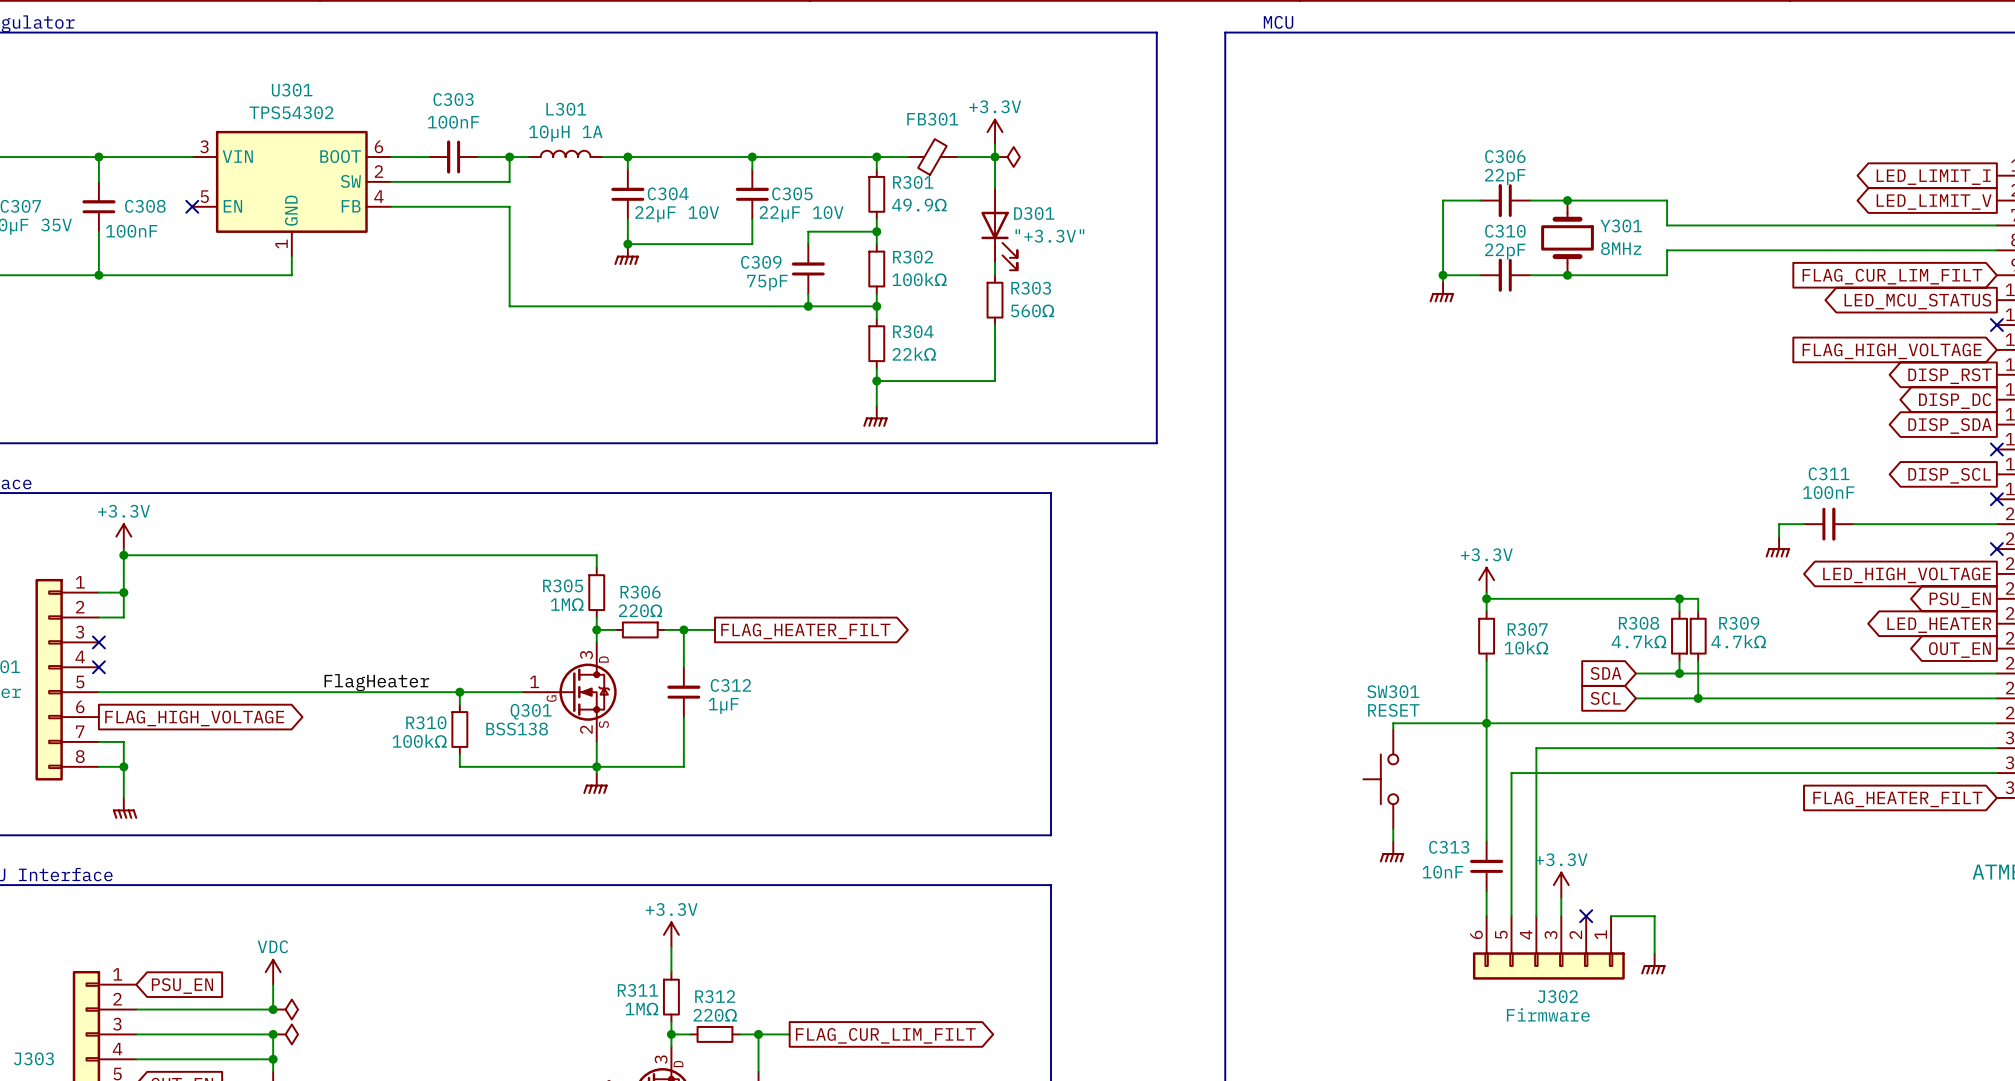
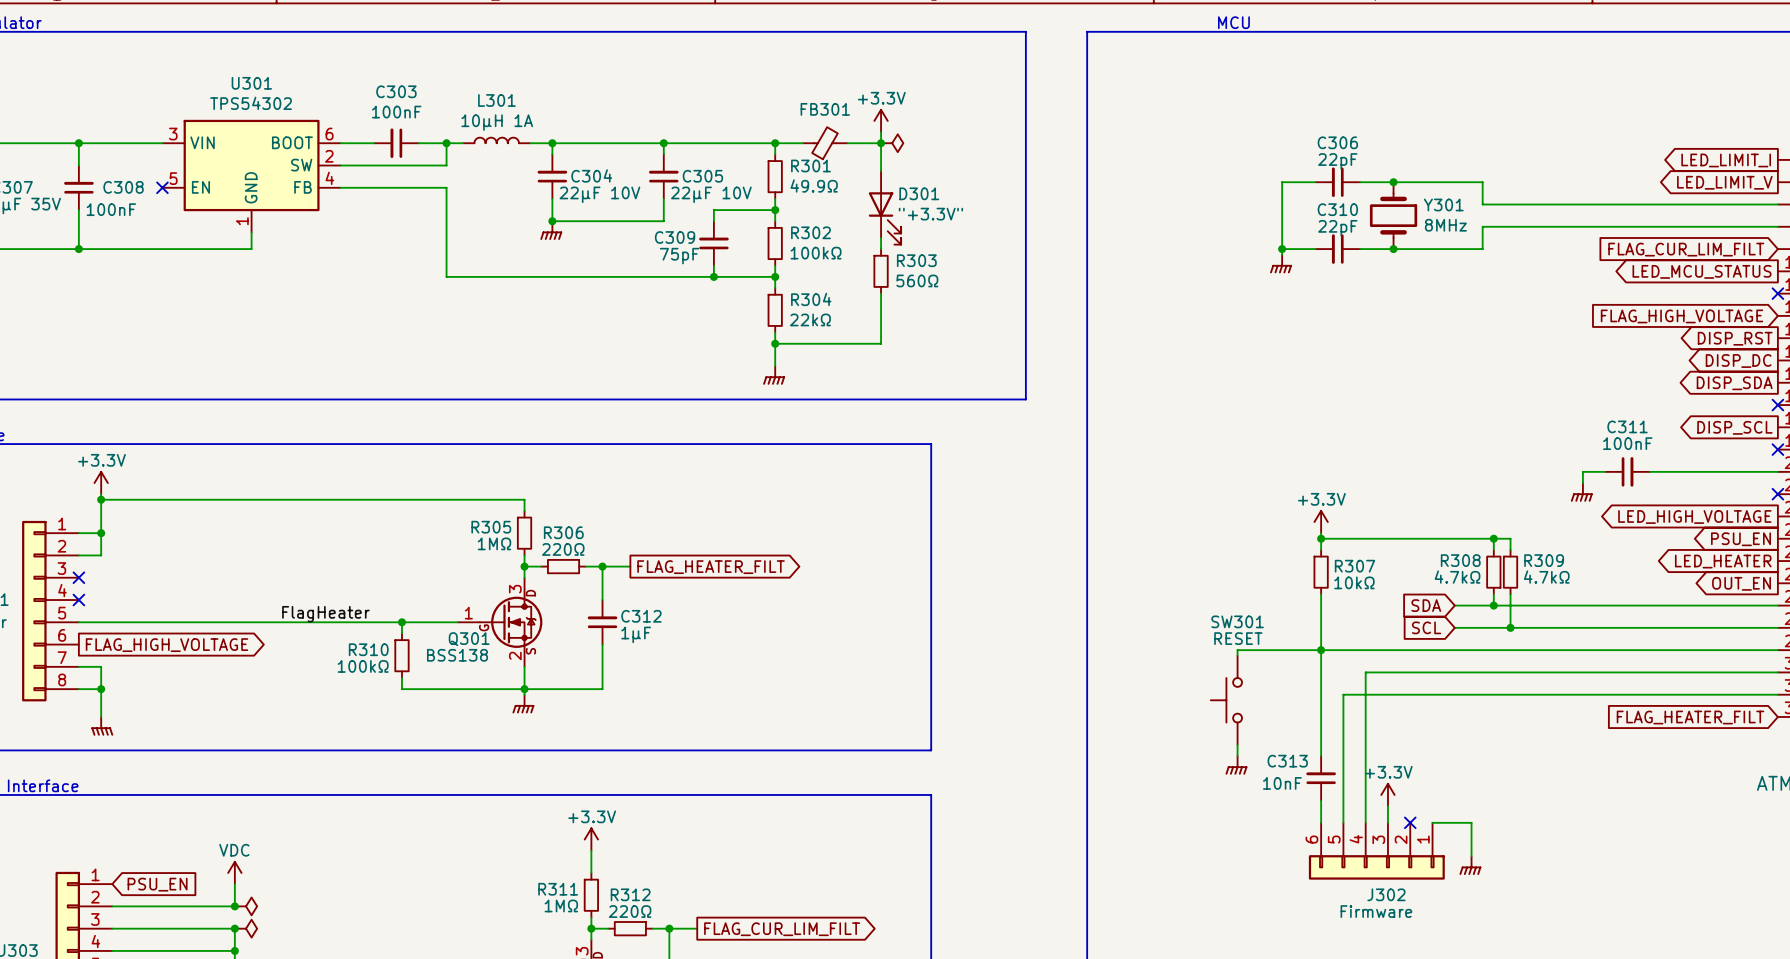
text position: MCU (1278, 22) -> MCU (1233, 22)

